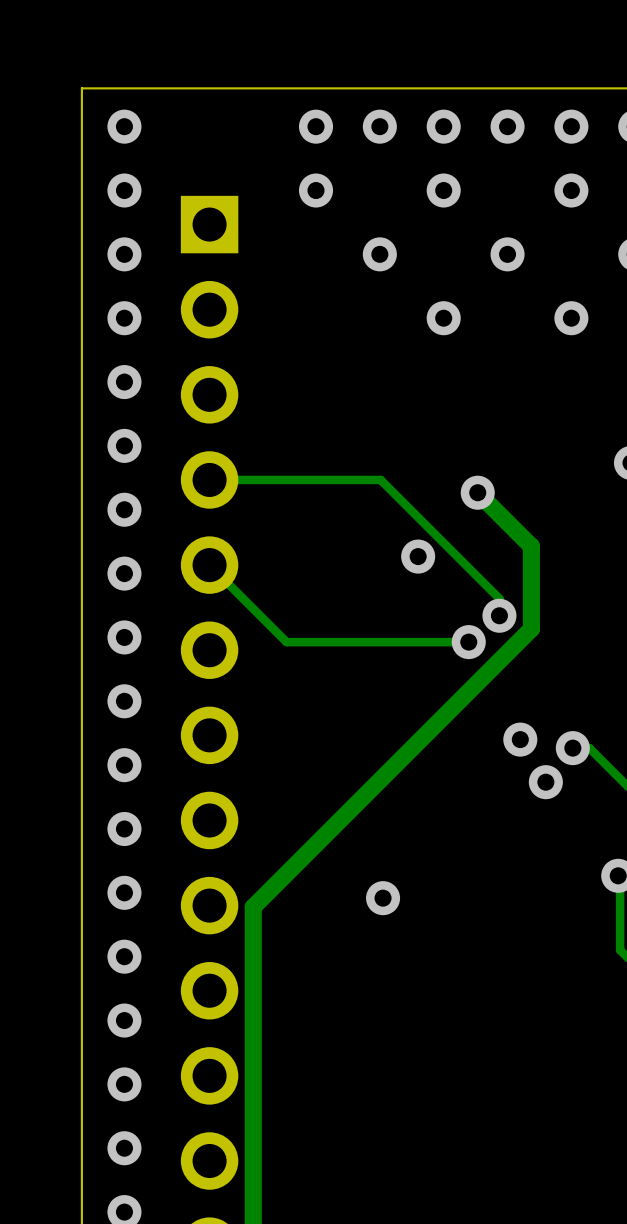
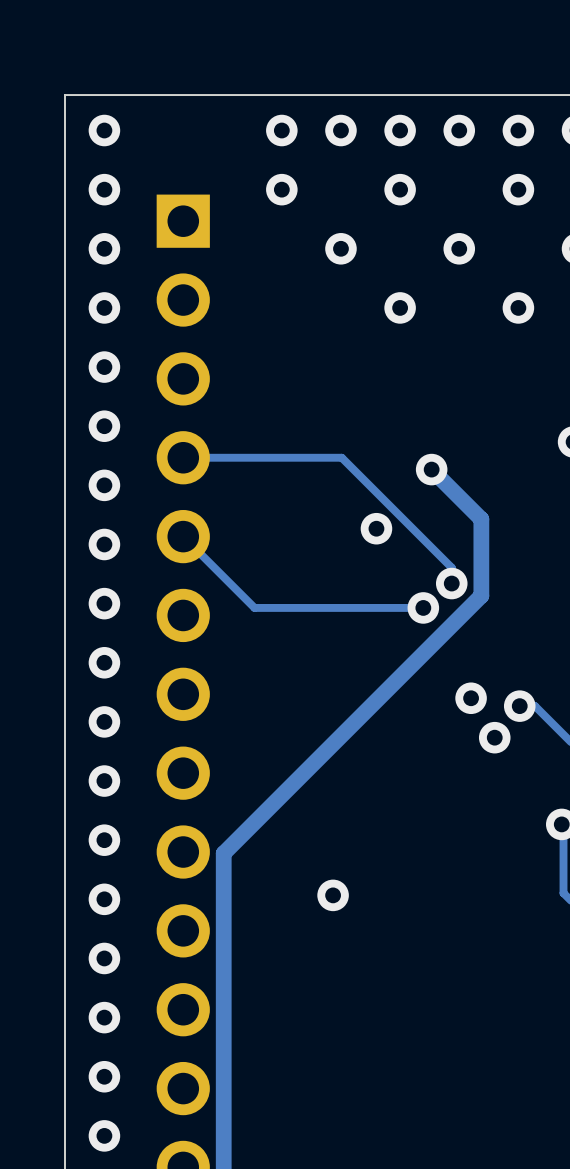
via position: (383, 898) -> (333, 895)

